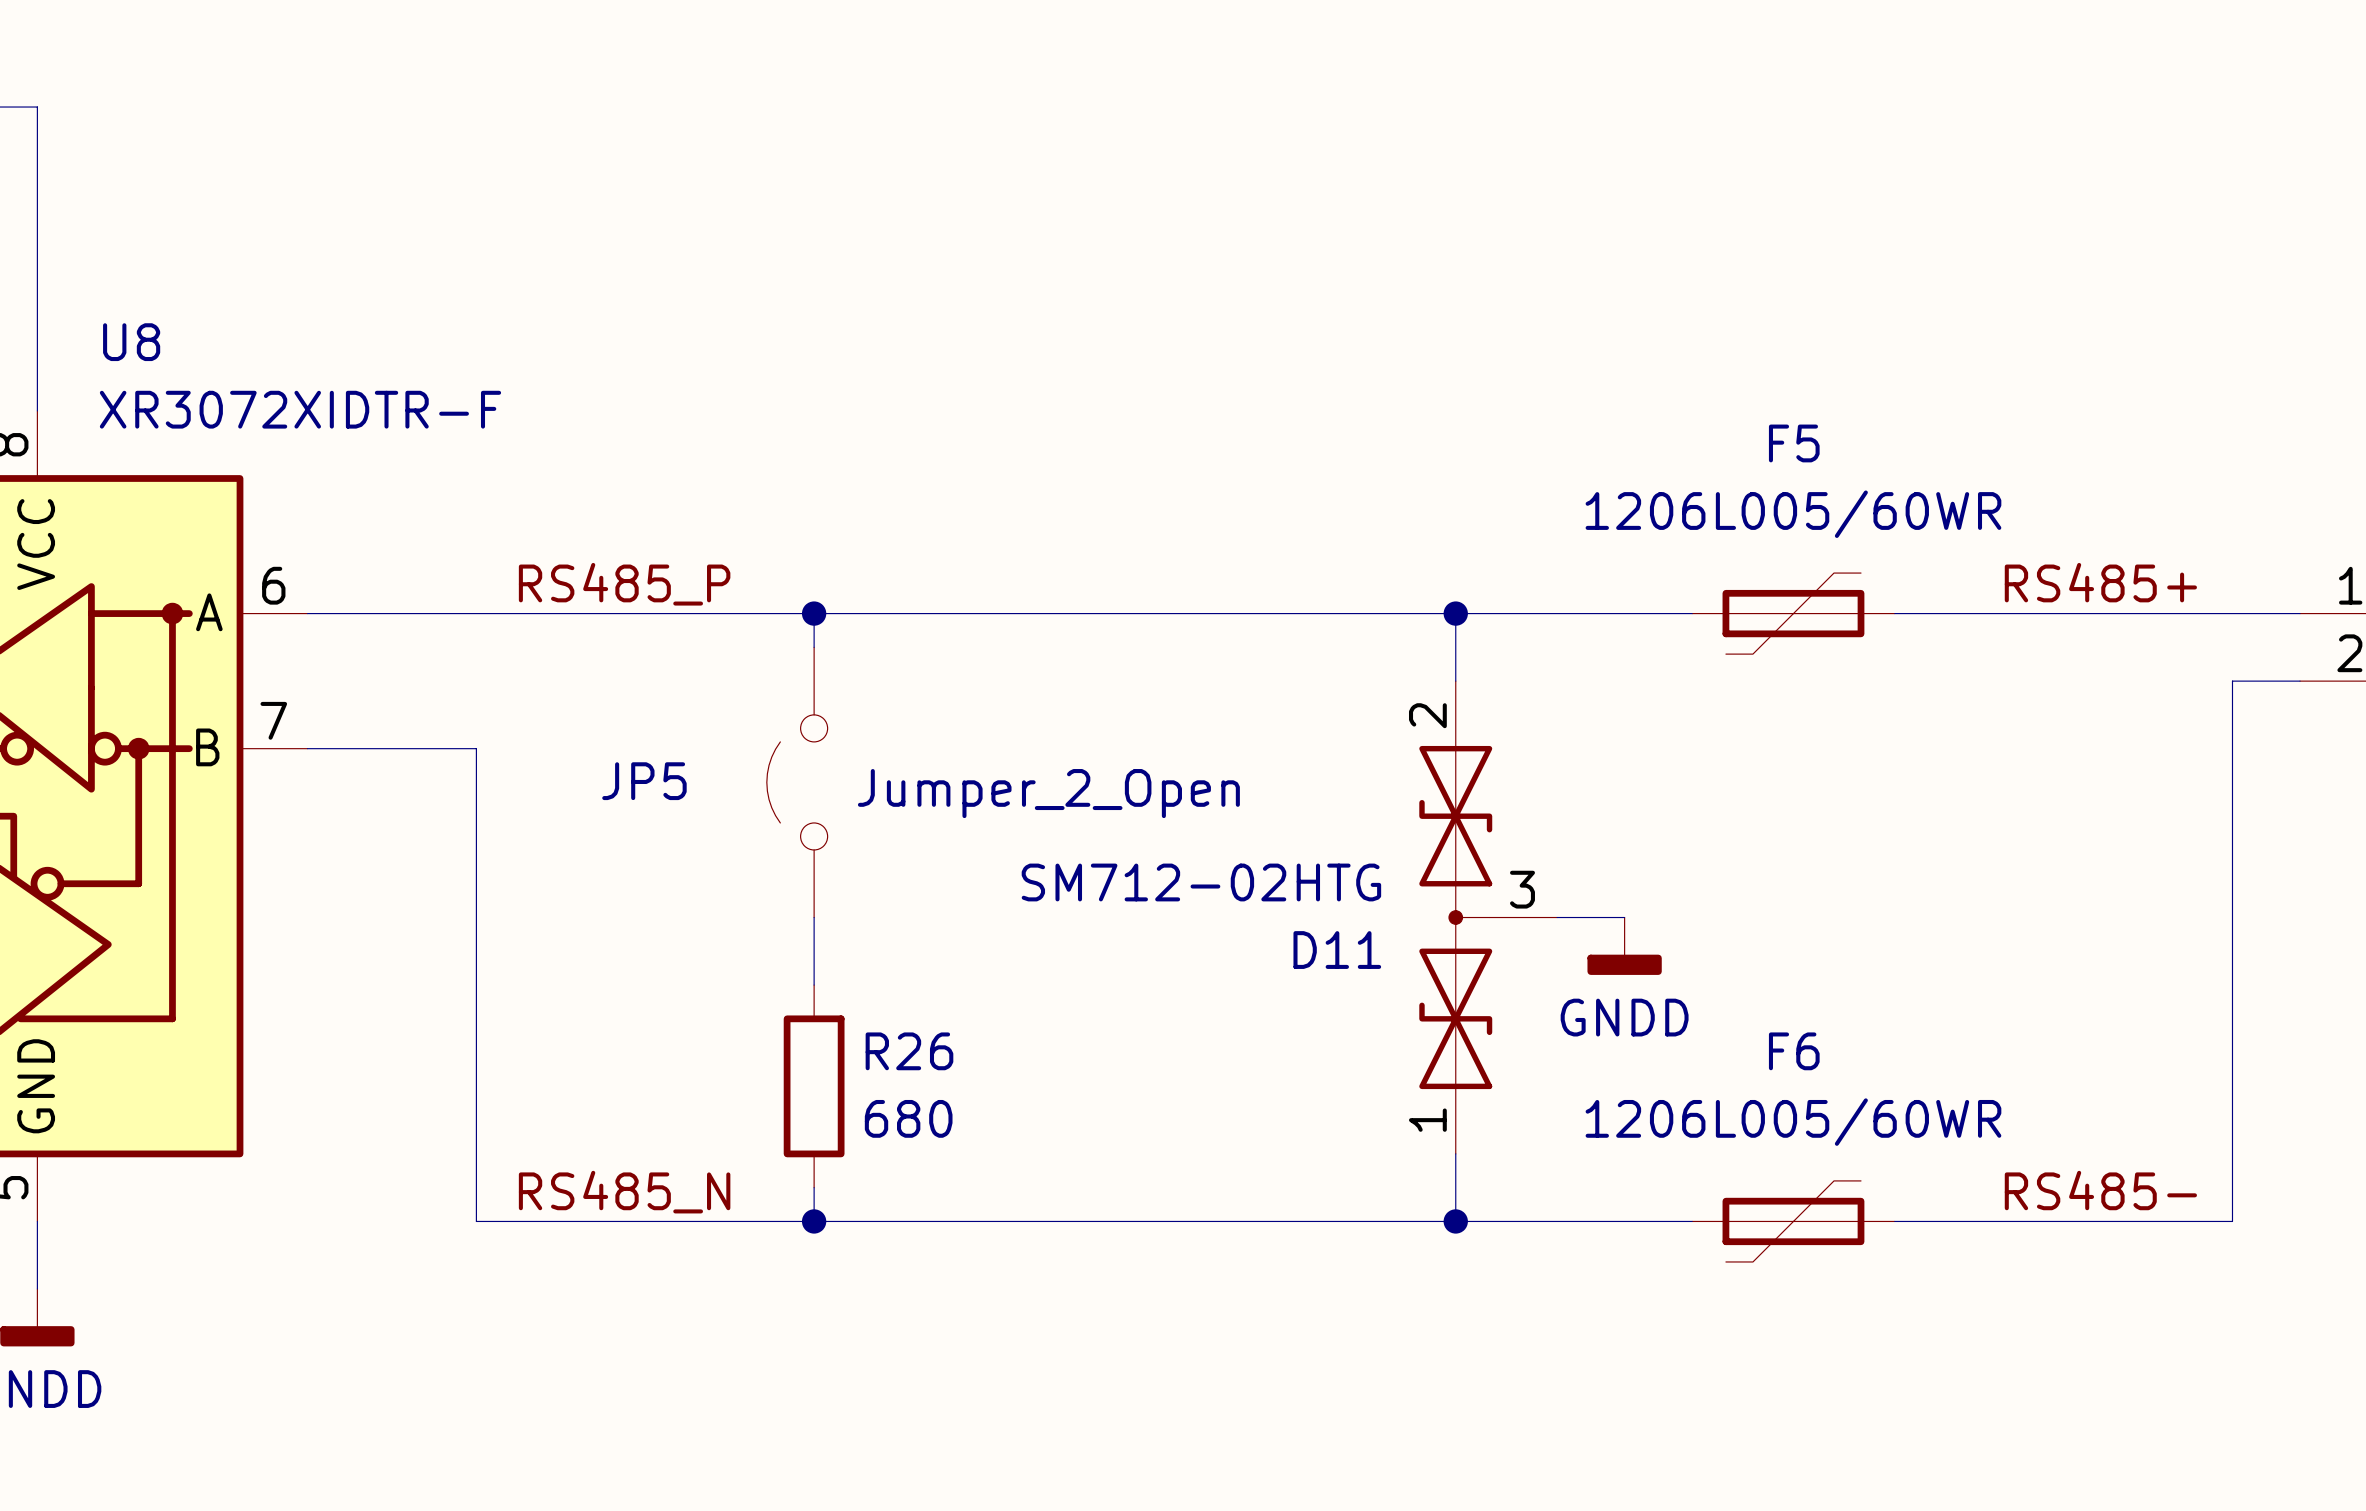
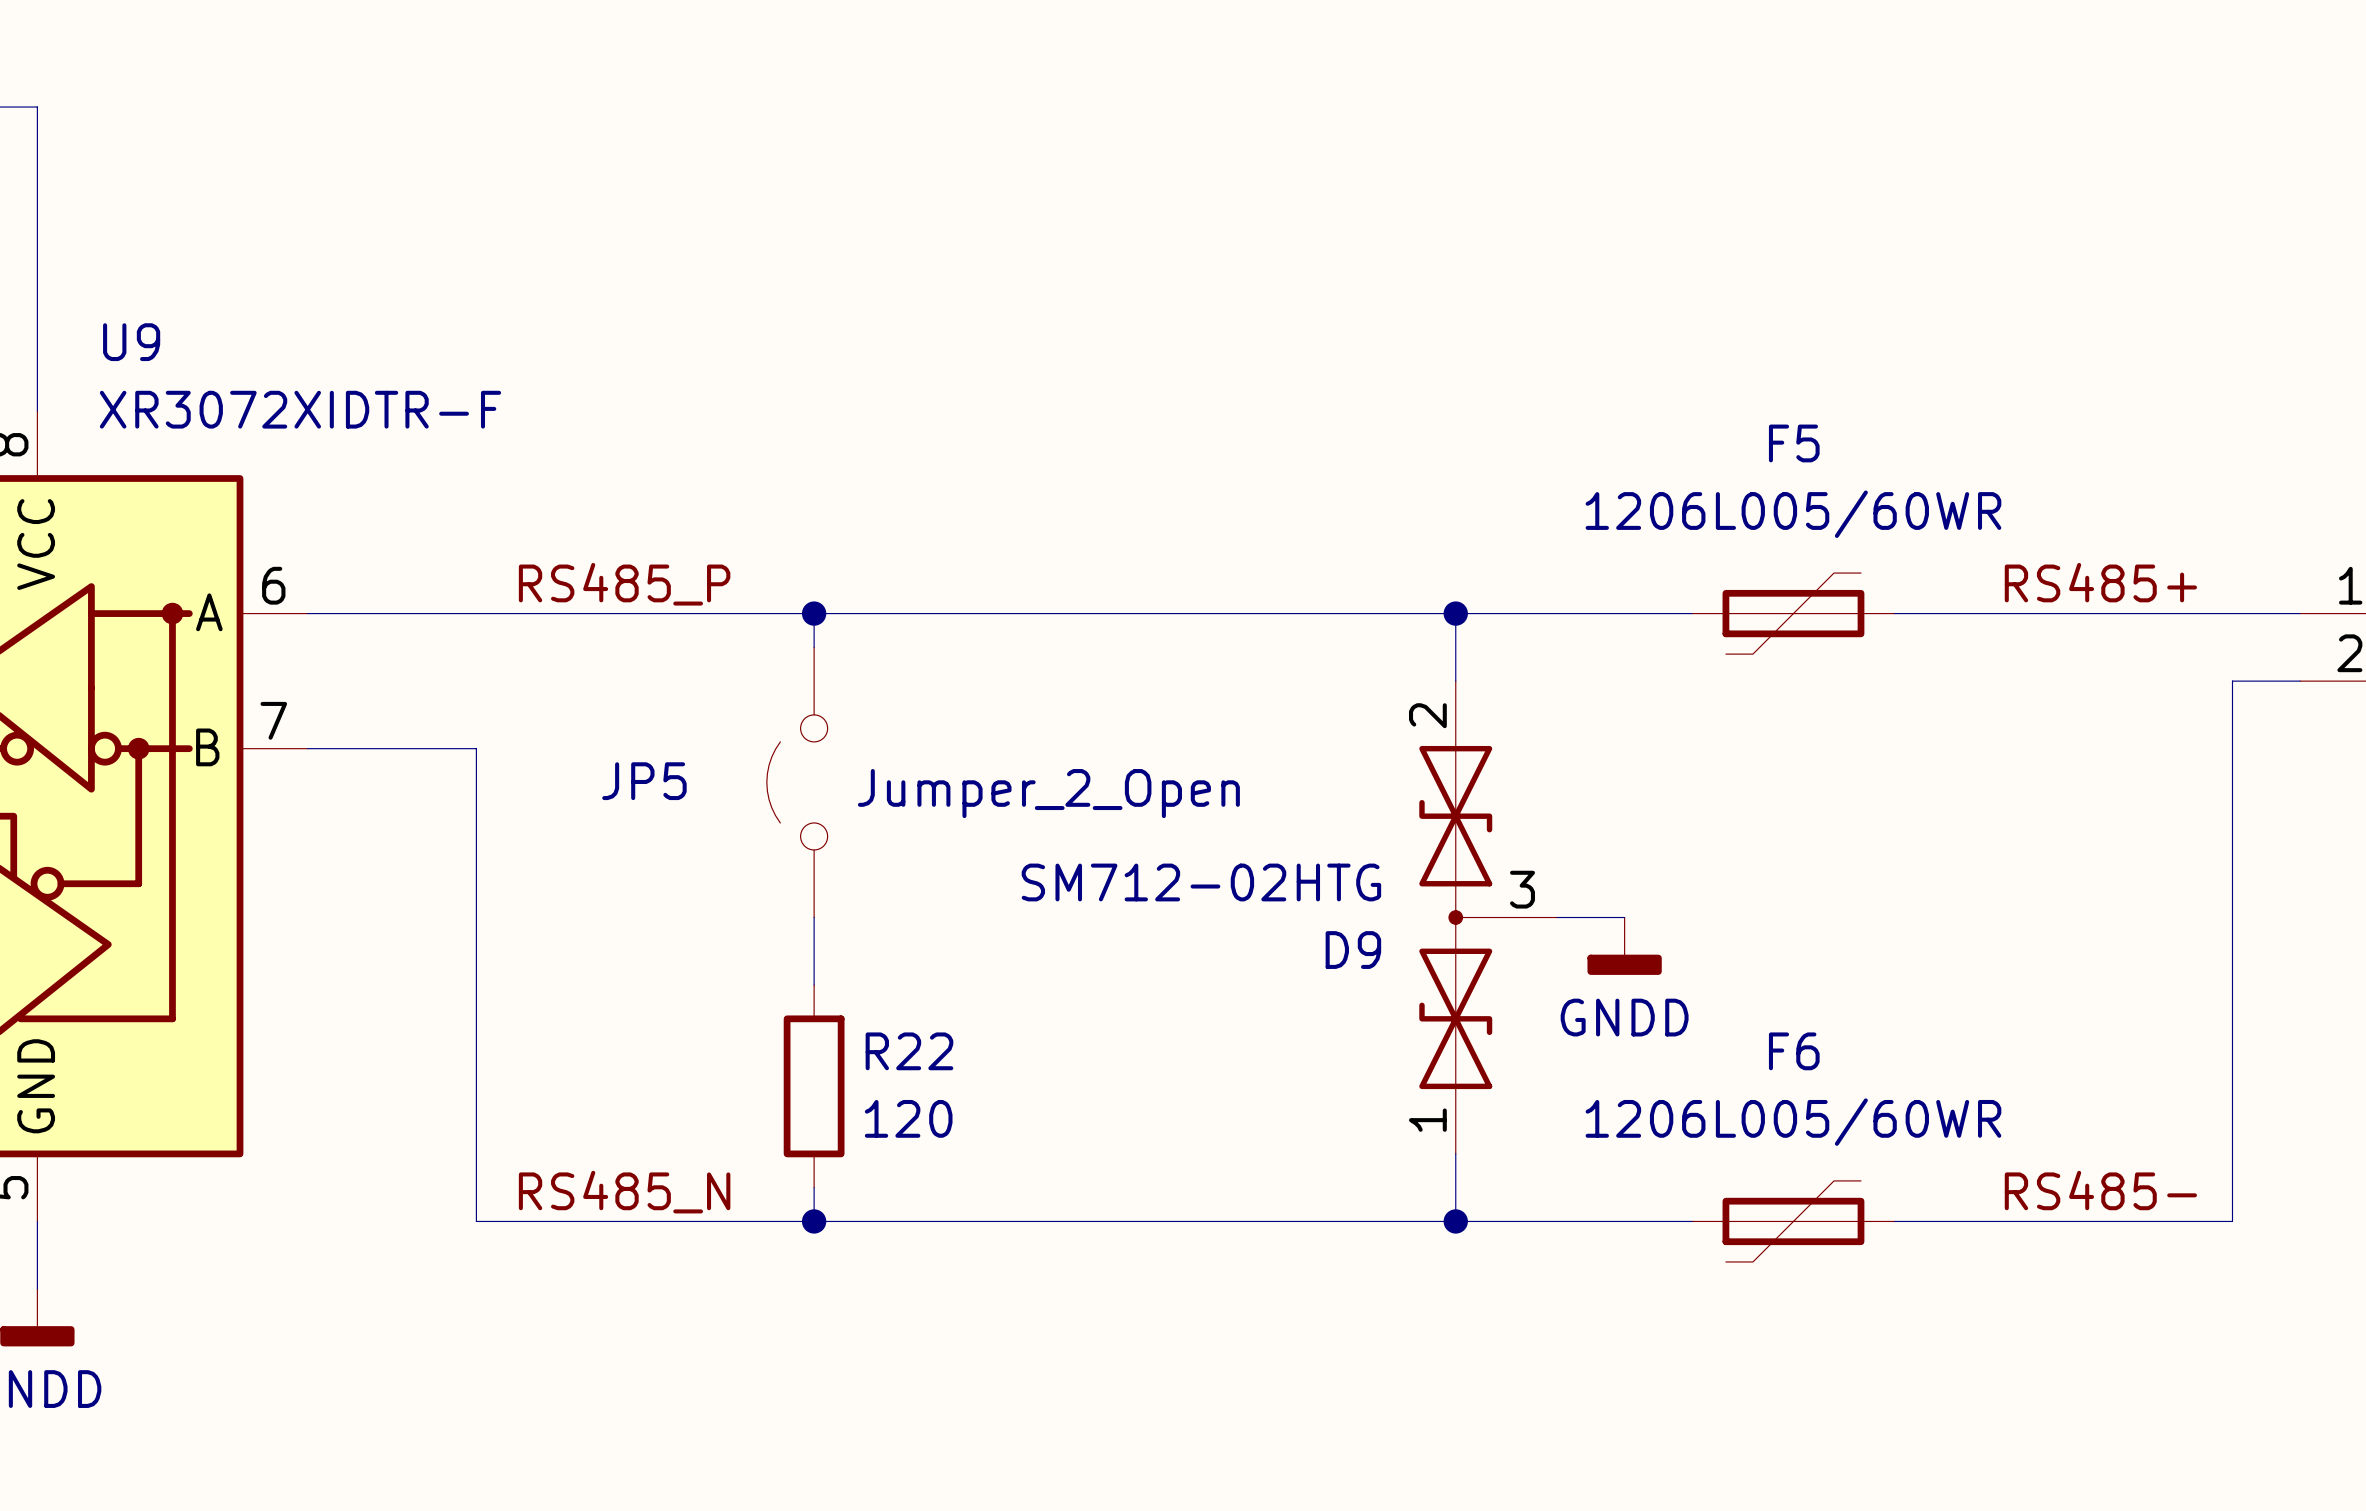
U8 name: U8 (131, 342) -> U9 (131, 342)
D11 name: D11 (1337, 950) -> D9 (1353, 950)
R26 name: R26 (909, 1051) -> R22 (909, 1051)
R26 value: 680 (908, 1118) -> 120 (908, 1118)

